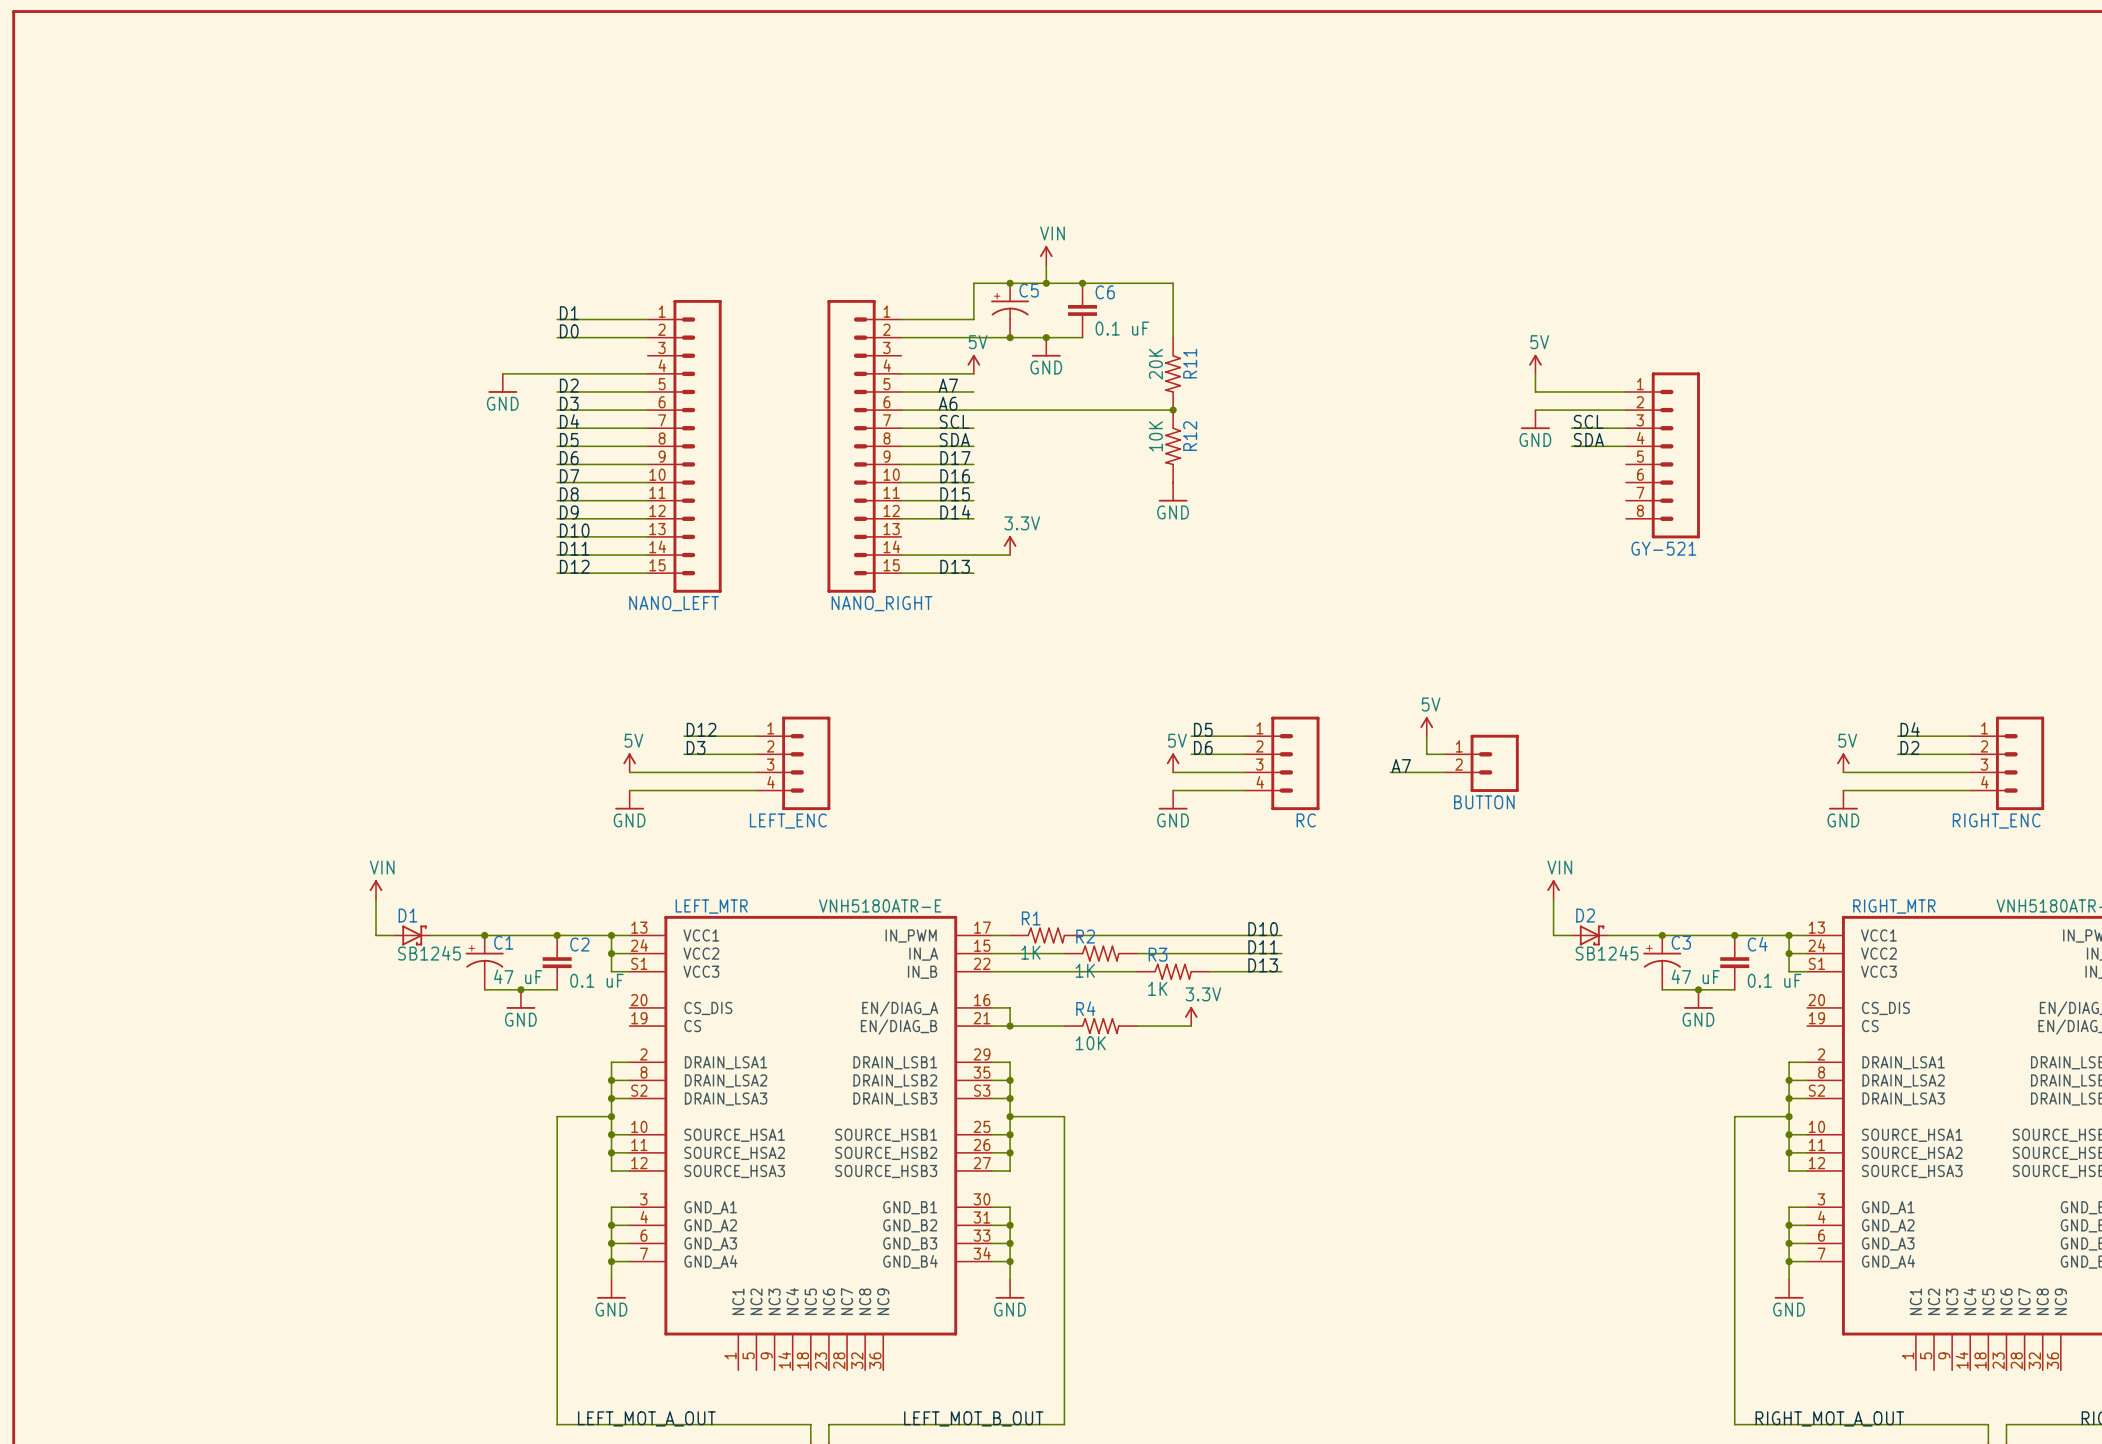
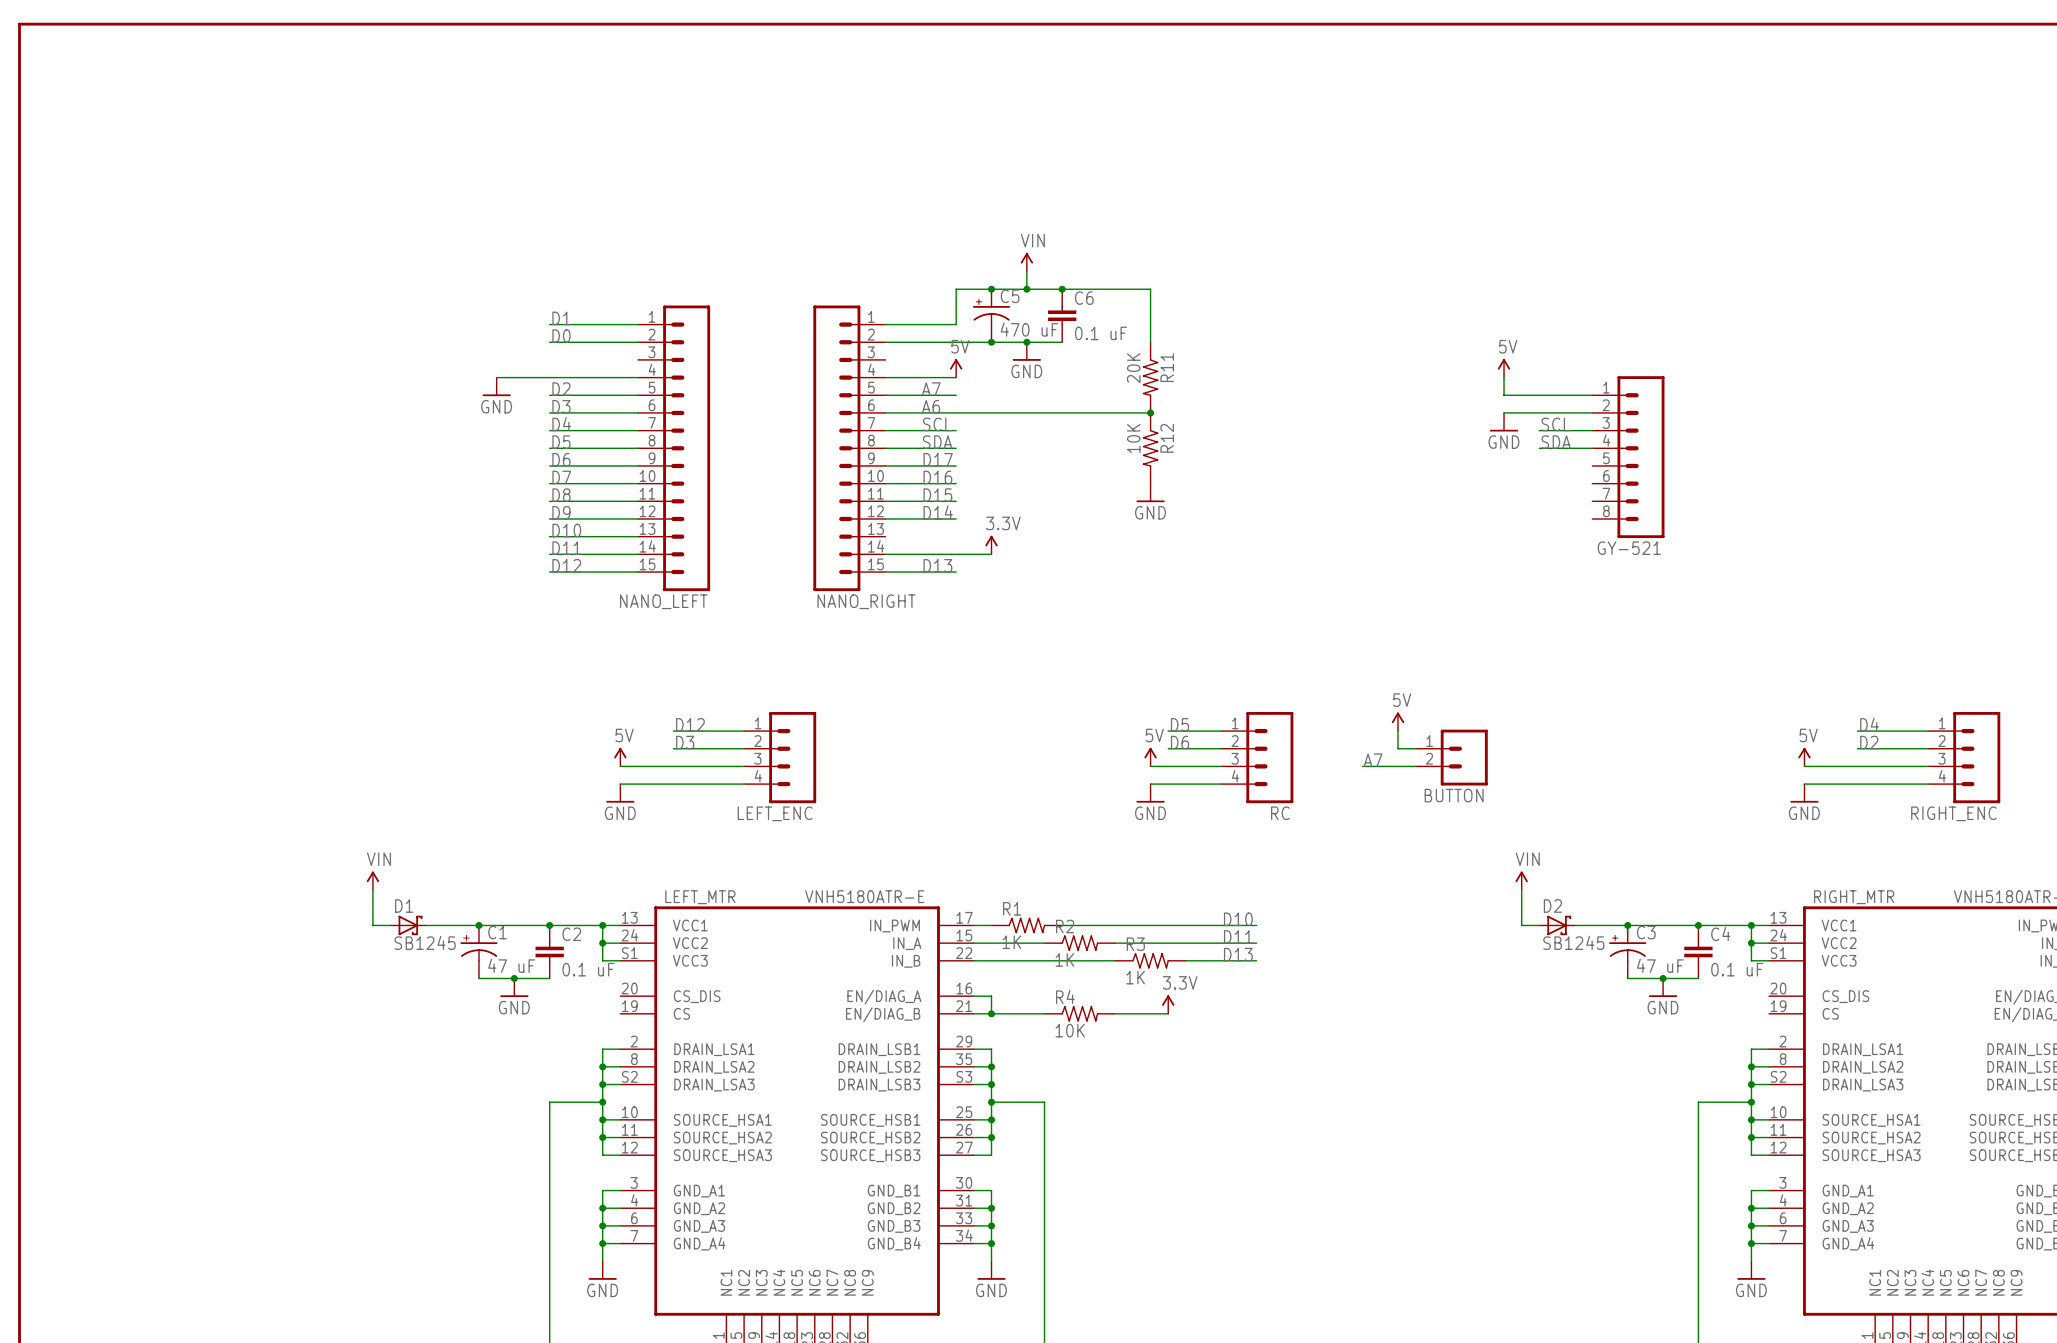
C5 value: none -> 470 uF (1029, 329)

